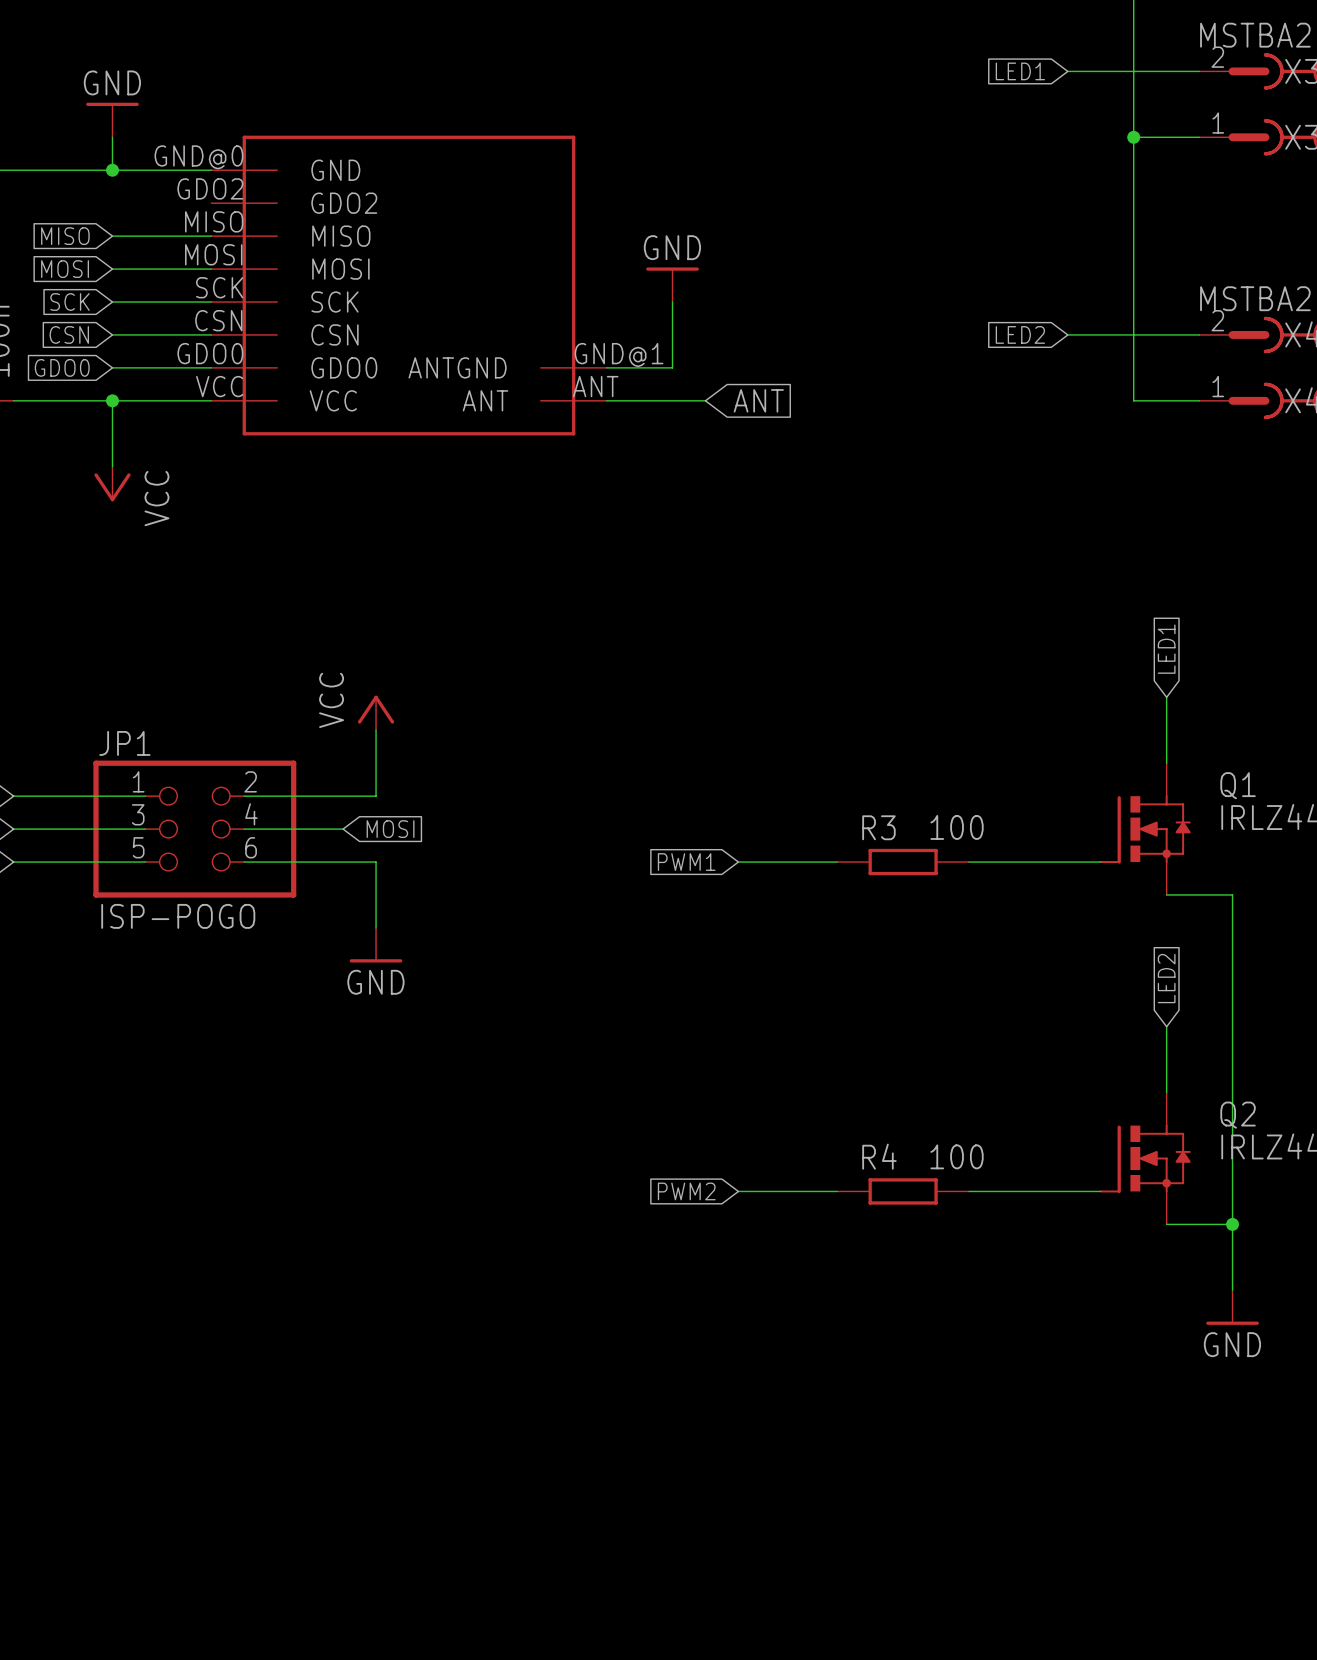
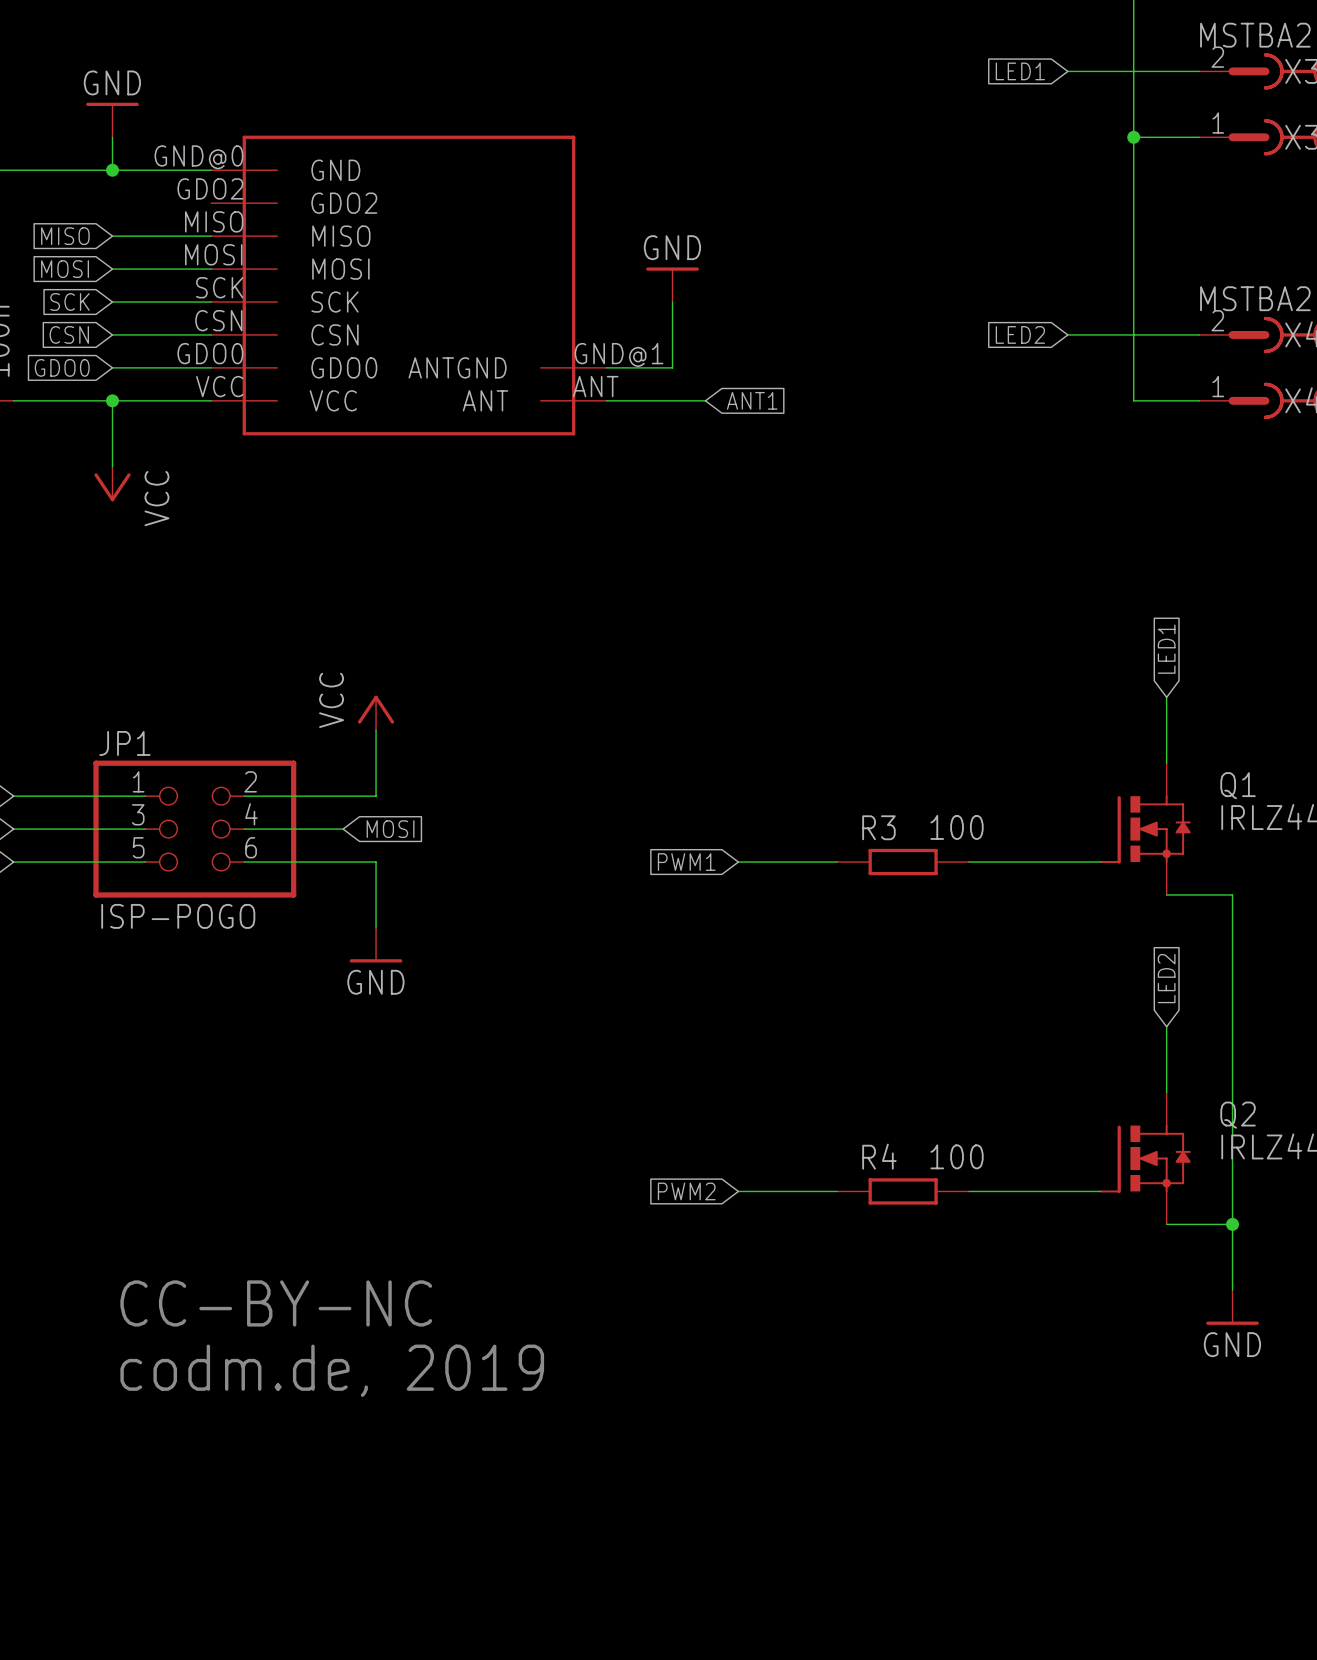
global label: ANT (758, 400) -> ANT1 (752, 400)
text: none -> CC-BY-NC (276, 1303)
text: none -> codm.de, 2019 (332, 1370)

